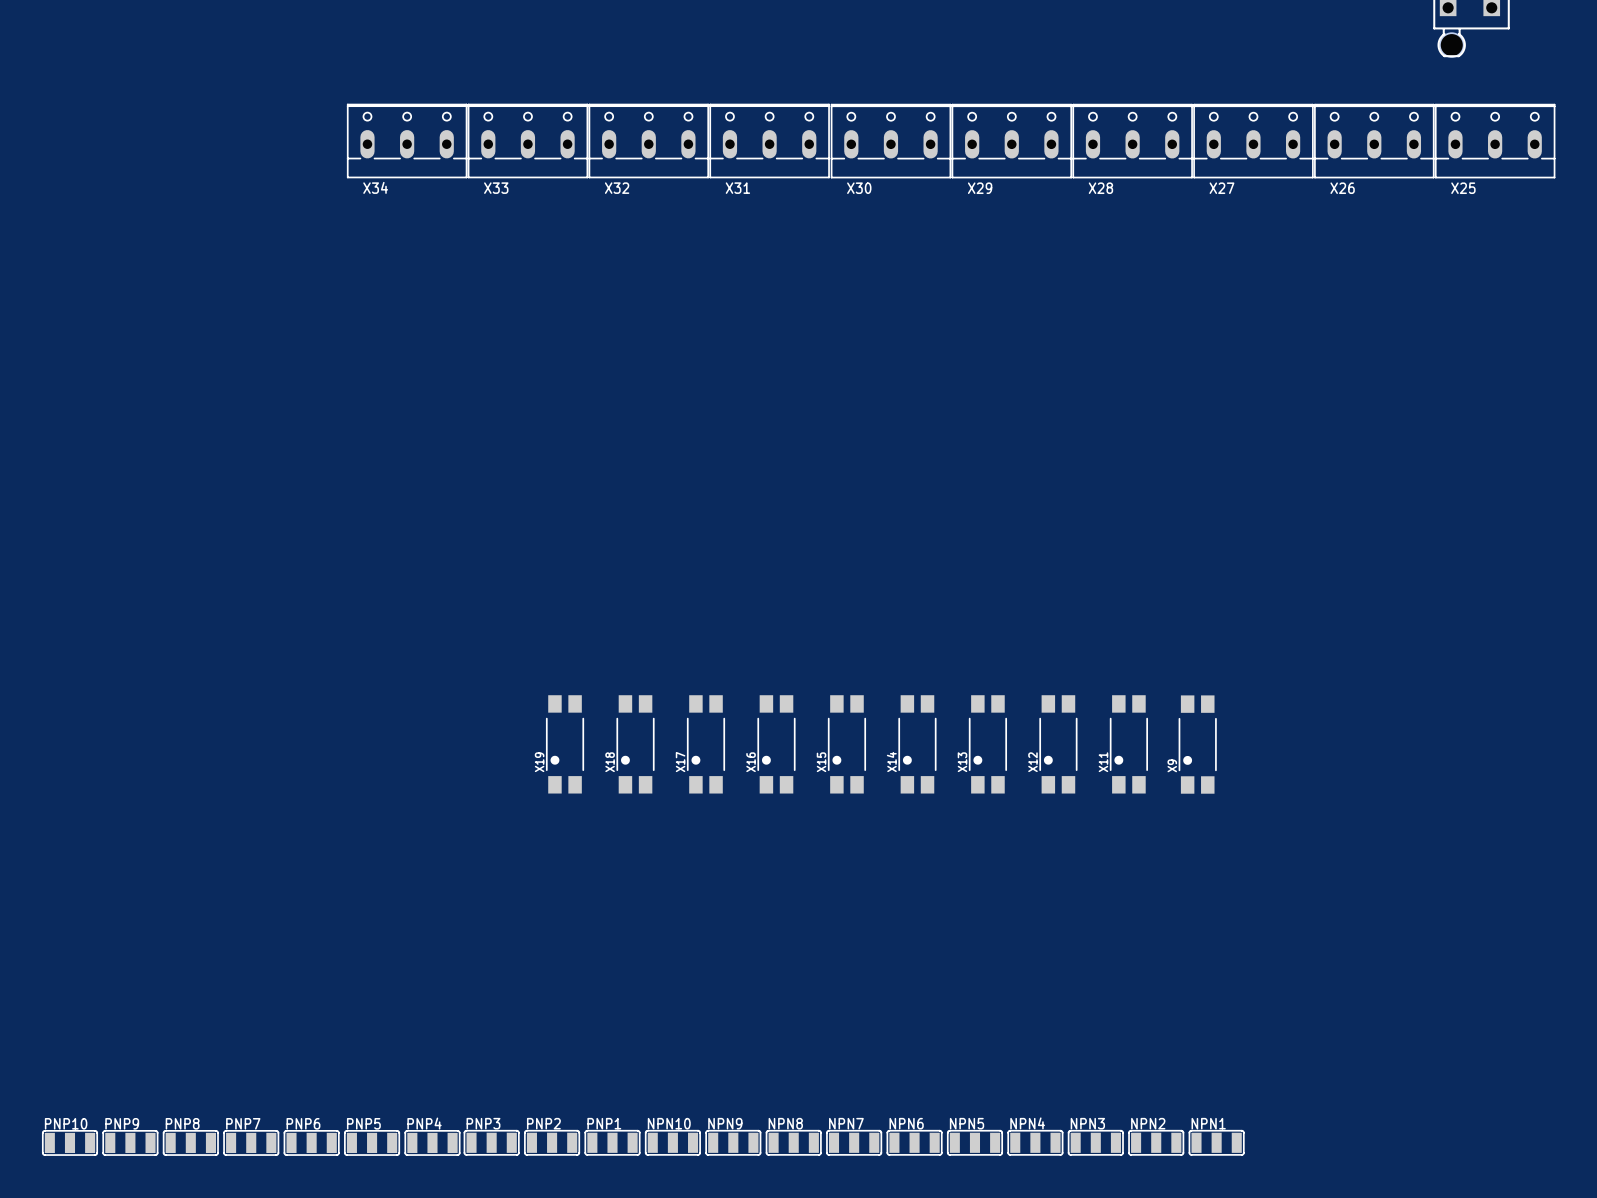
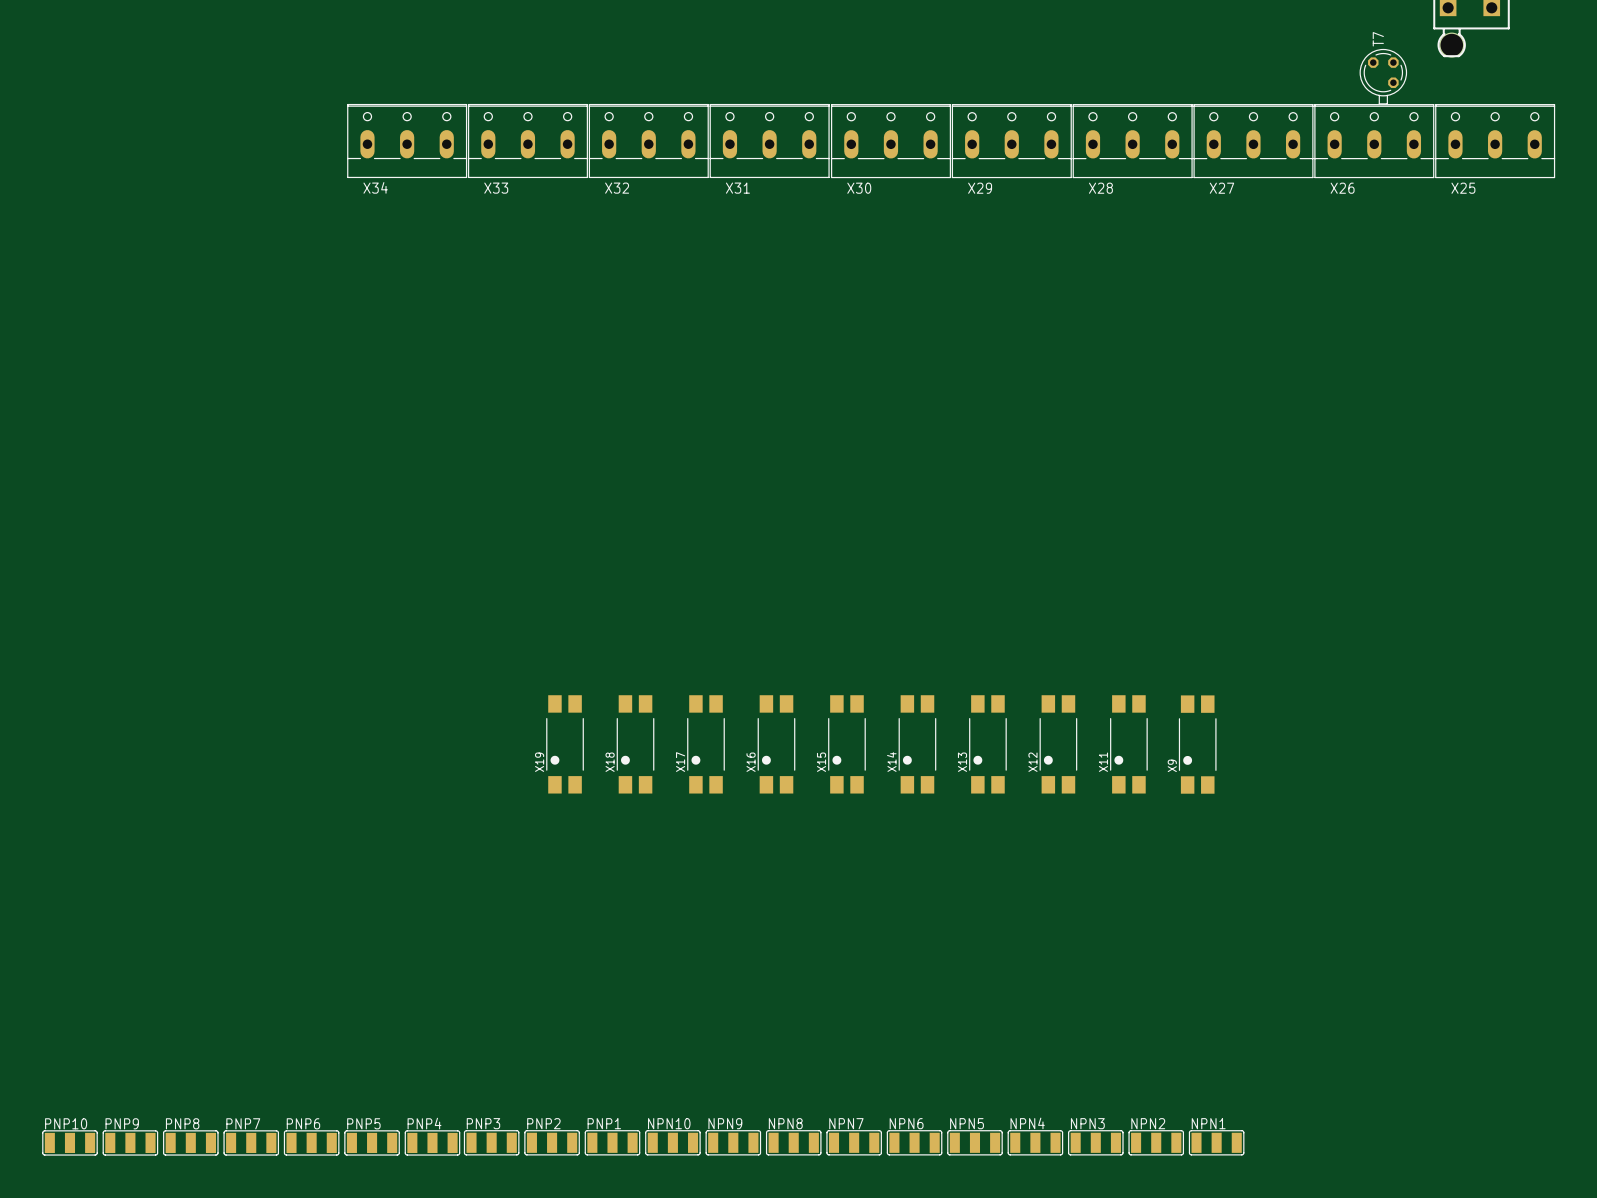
T7: none -> (1383, 76)

